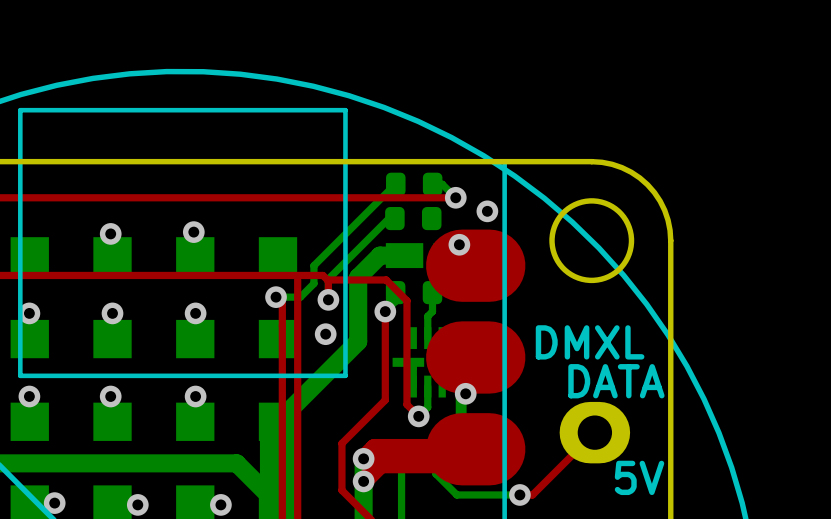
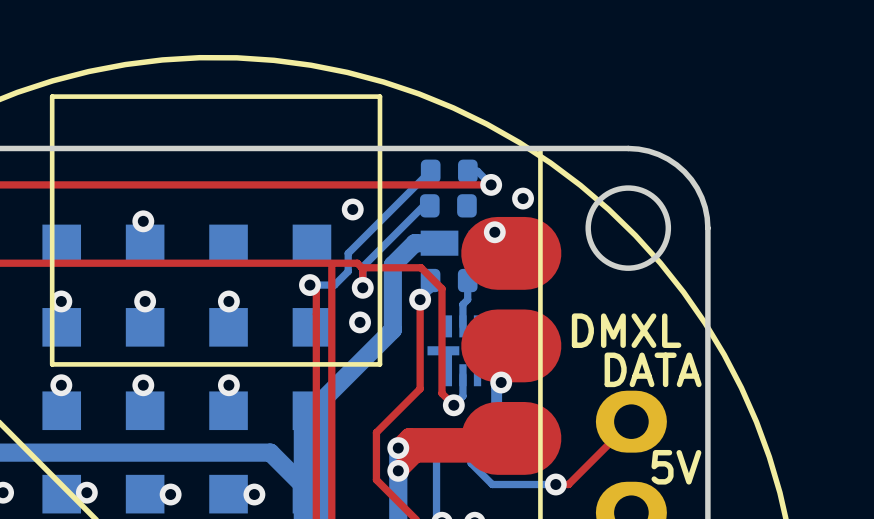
via position: (193, 232) -> (352, 209)

